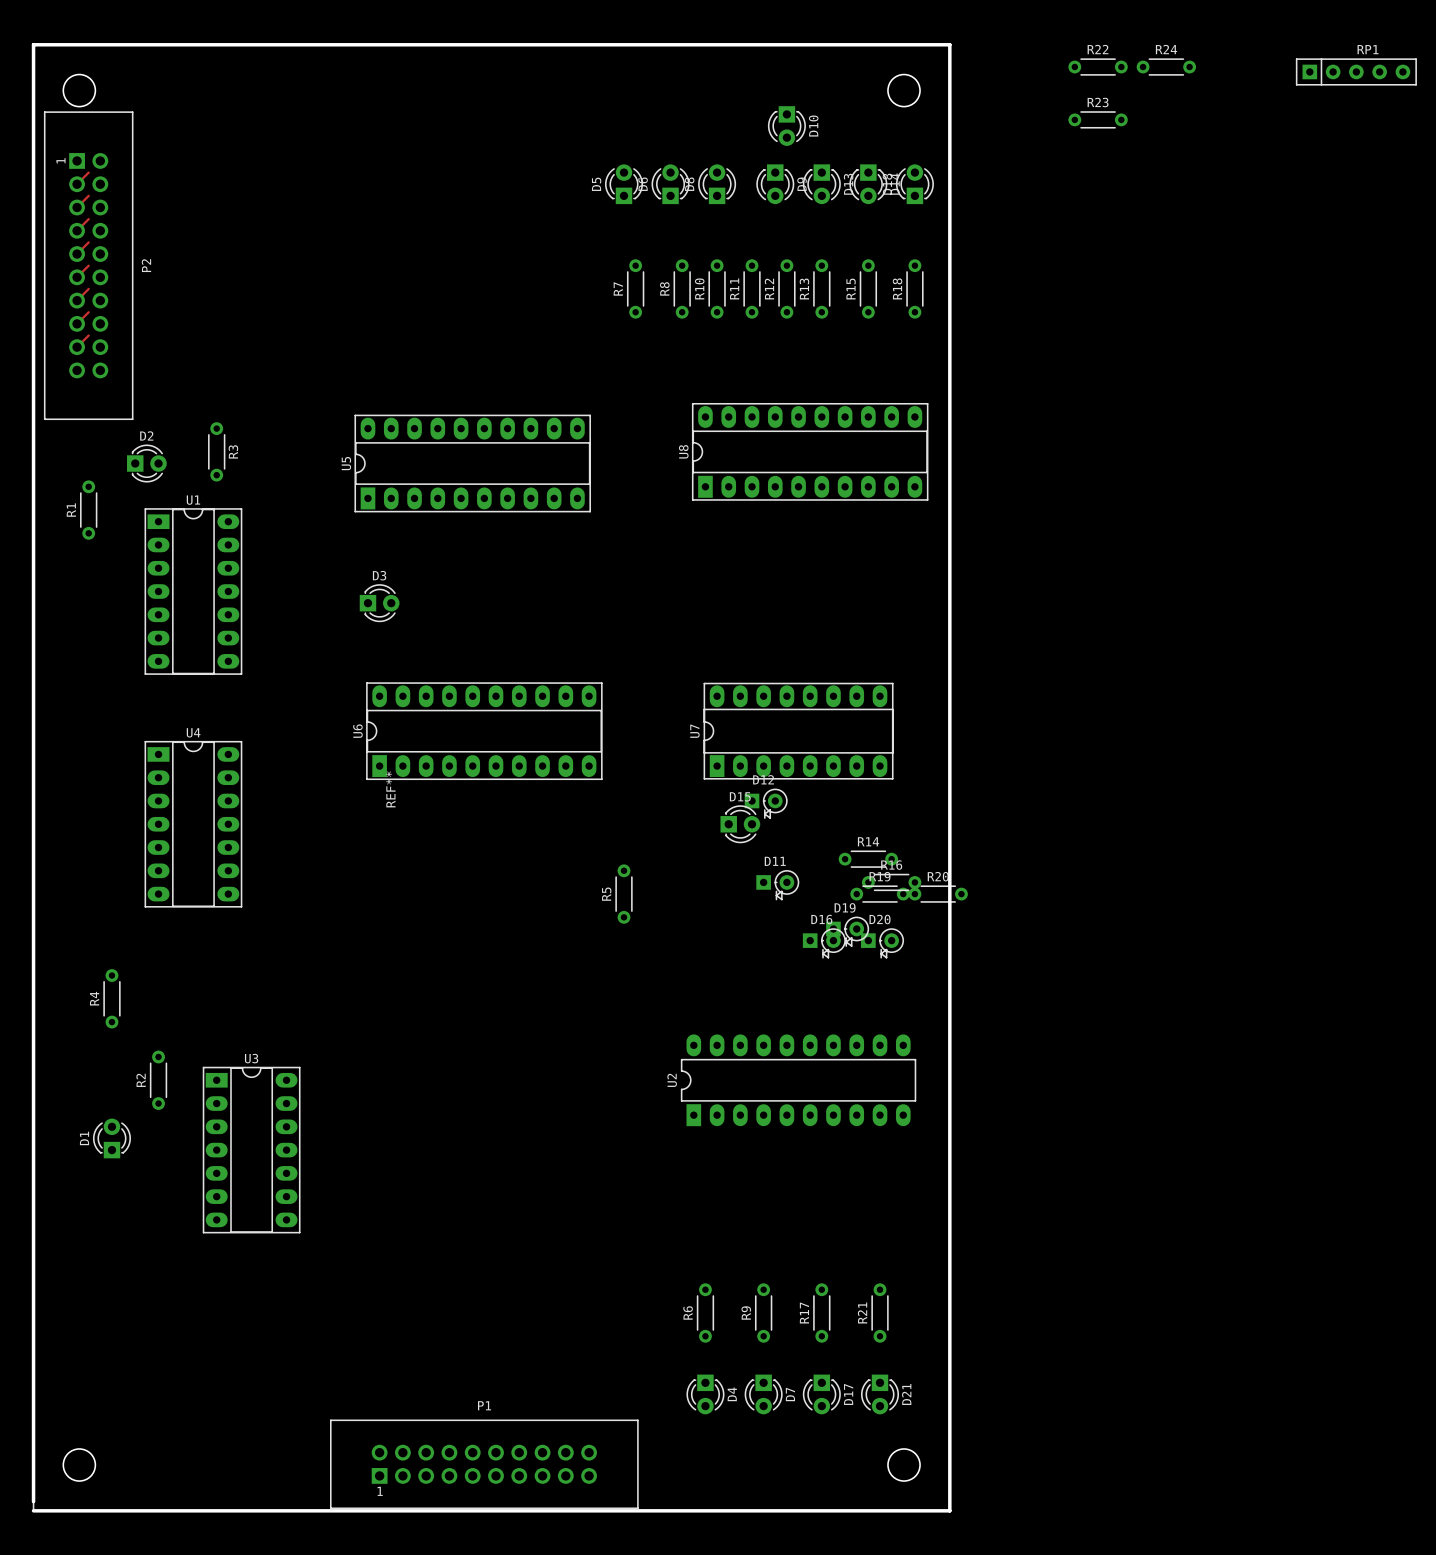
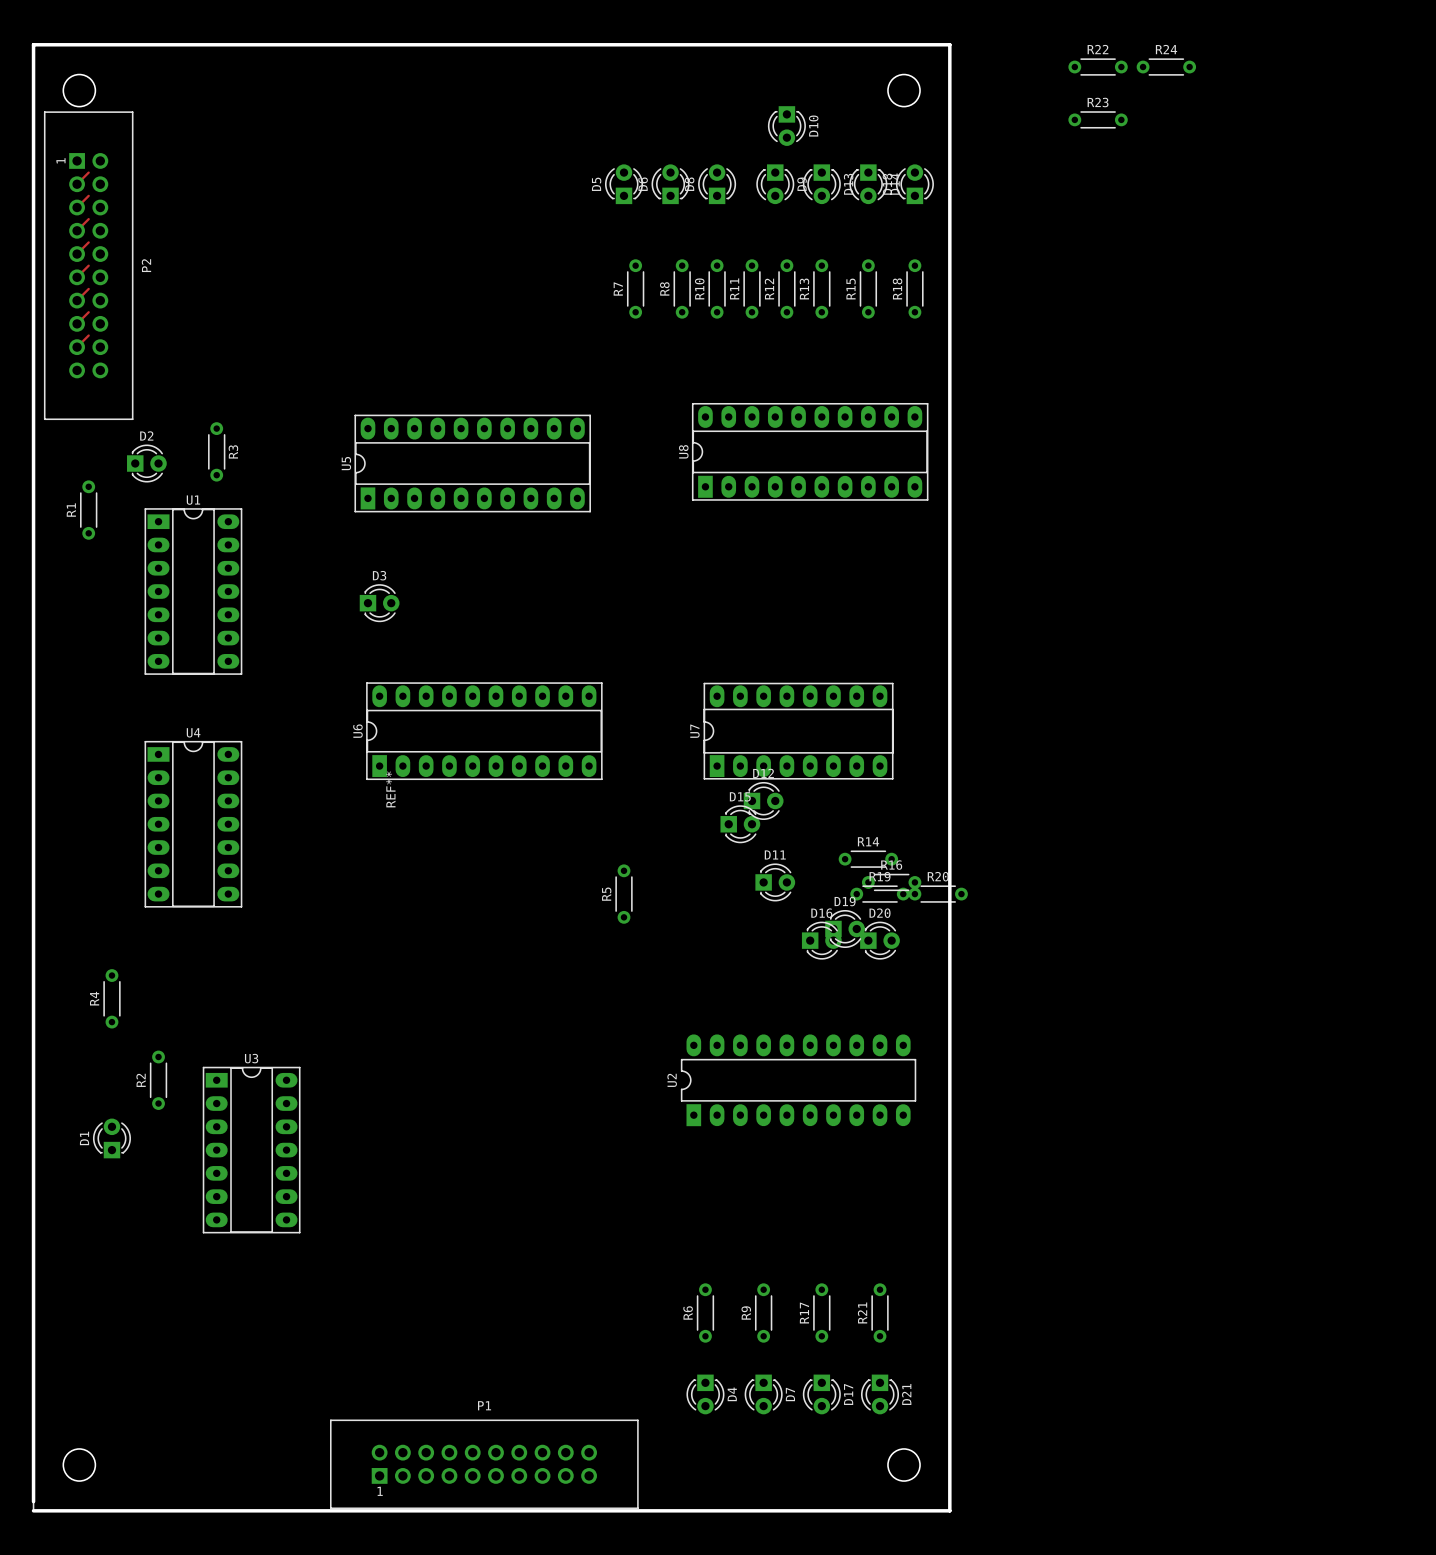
RP1: (1356, 71) -> none
D12 footprint: [744, 788, 788, 819] -> [743, 782, 784, 820]
D11 footprint: [756, 870, 800, 901] -> [755, 863, 796, 902]
D19 footprint: [826, 916, 869, 947] -> [825, 910, 865, 948]
D16 footprint: [802, 928, 846, 959] -> [801, 921, 842, 960]
D20 footprint: [861, 928, 904, 959] -> [860, 921, 900, 960]

